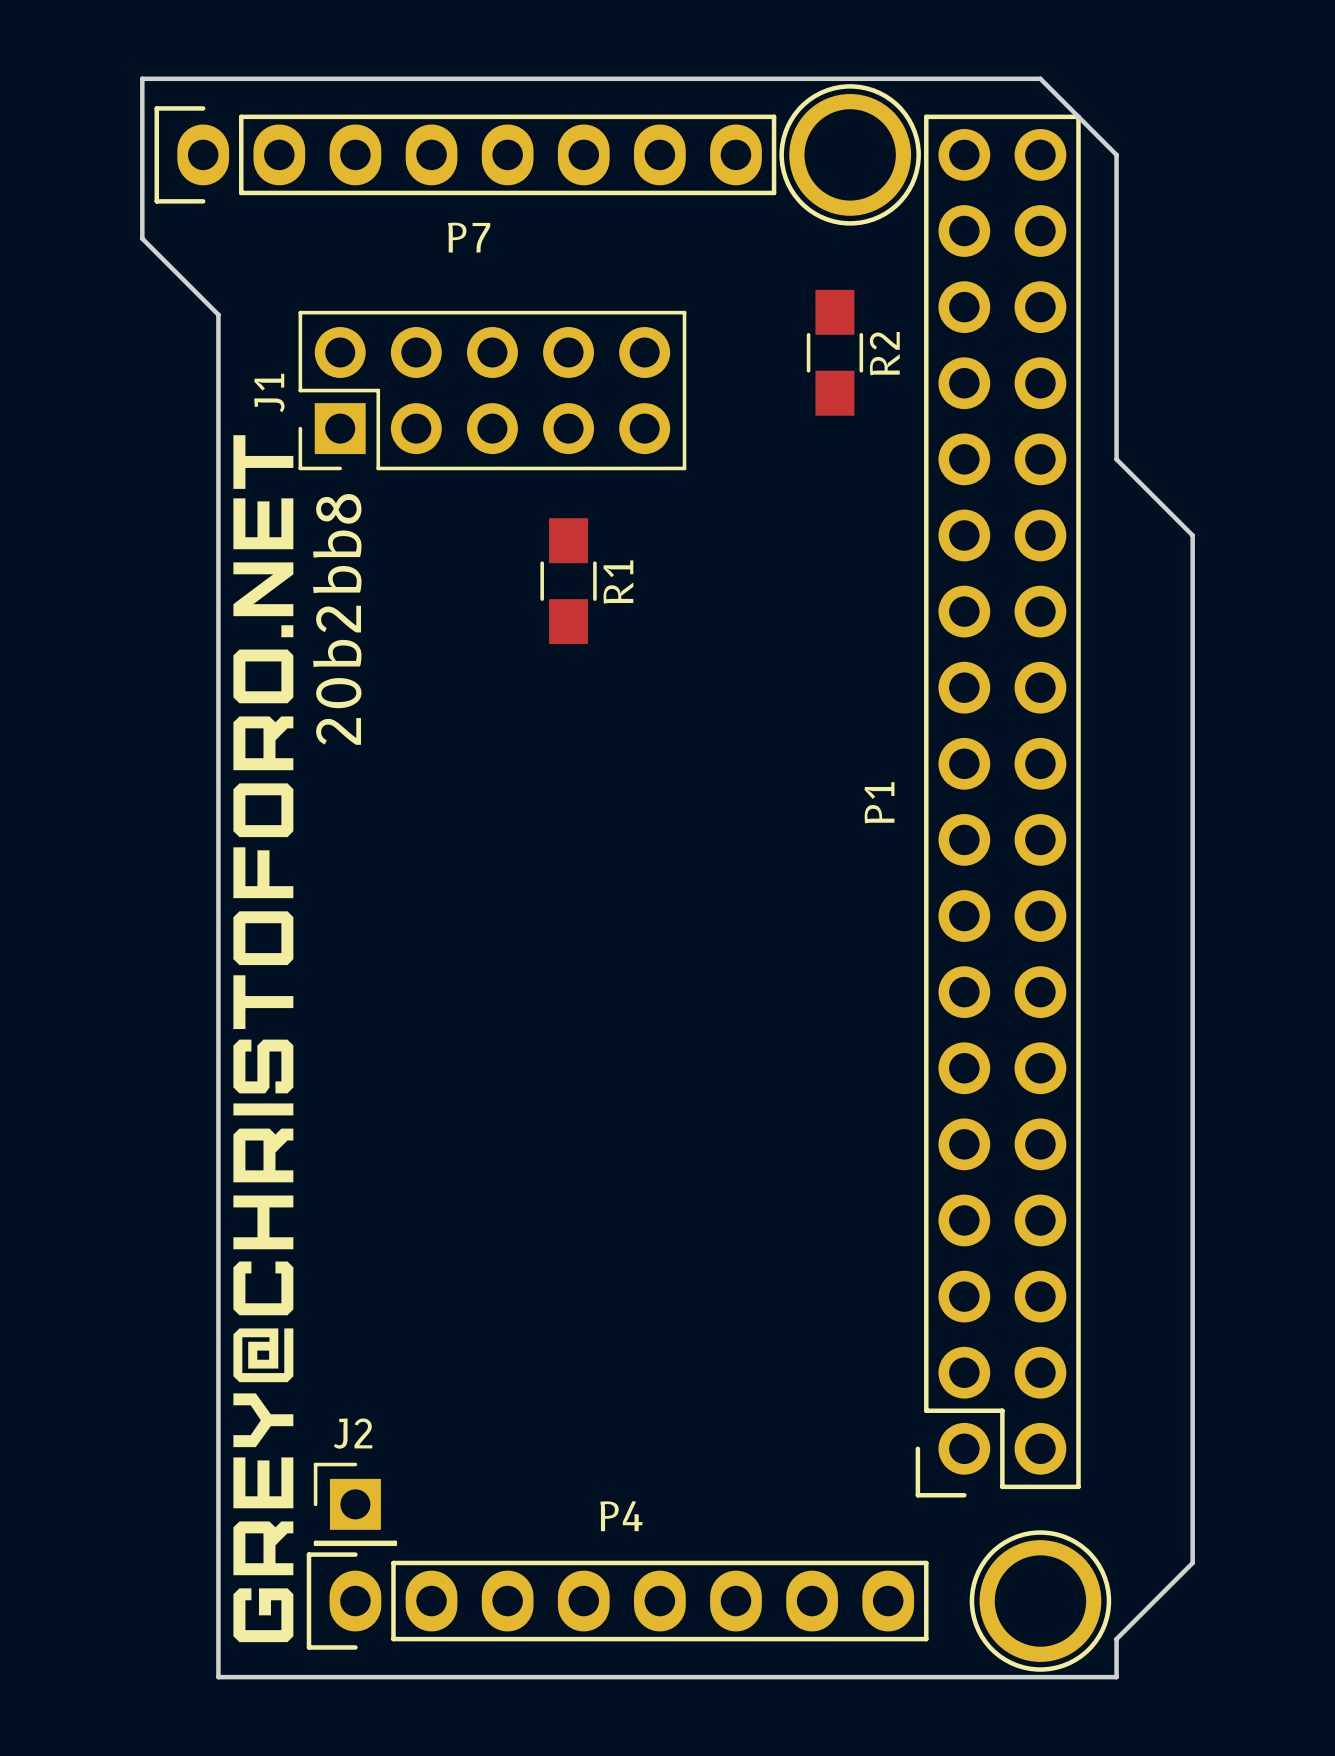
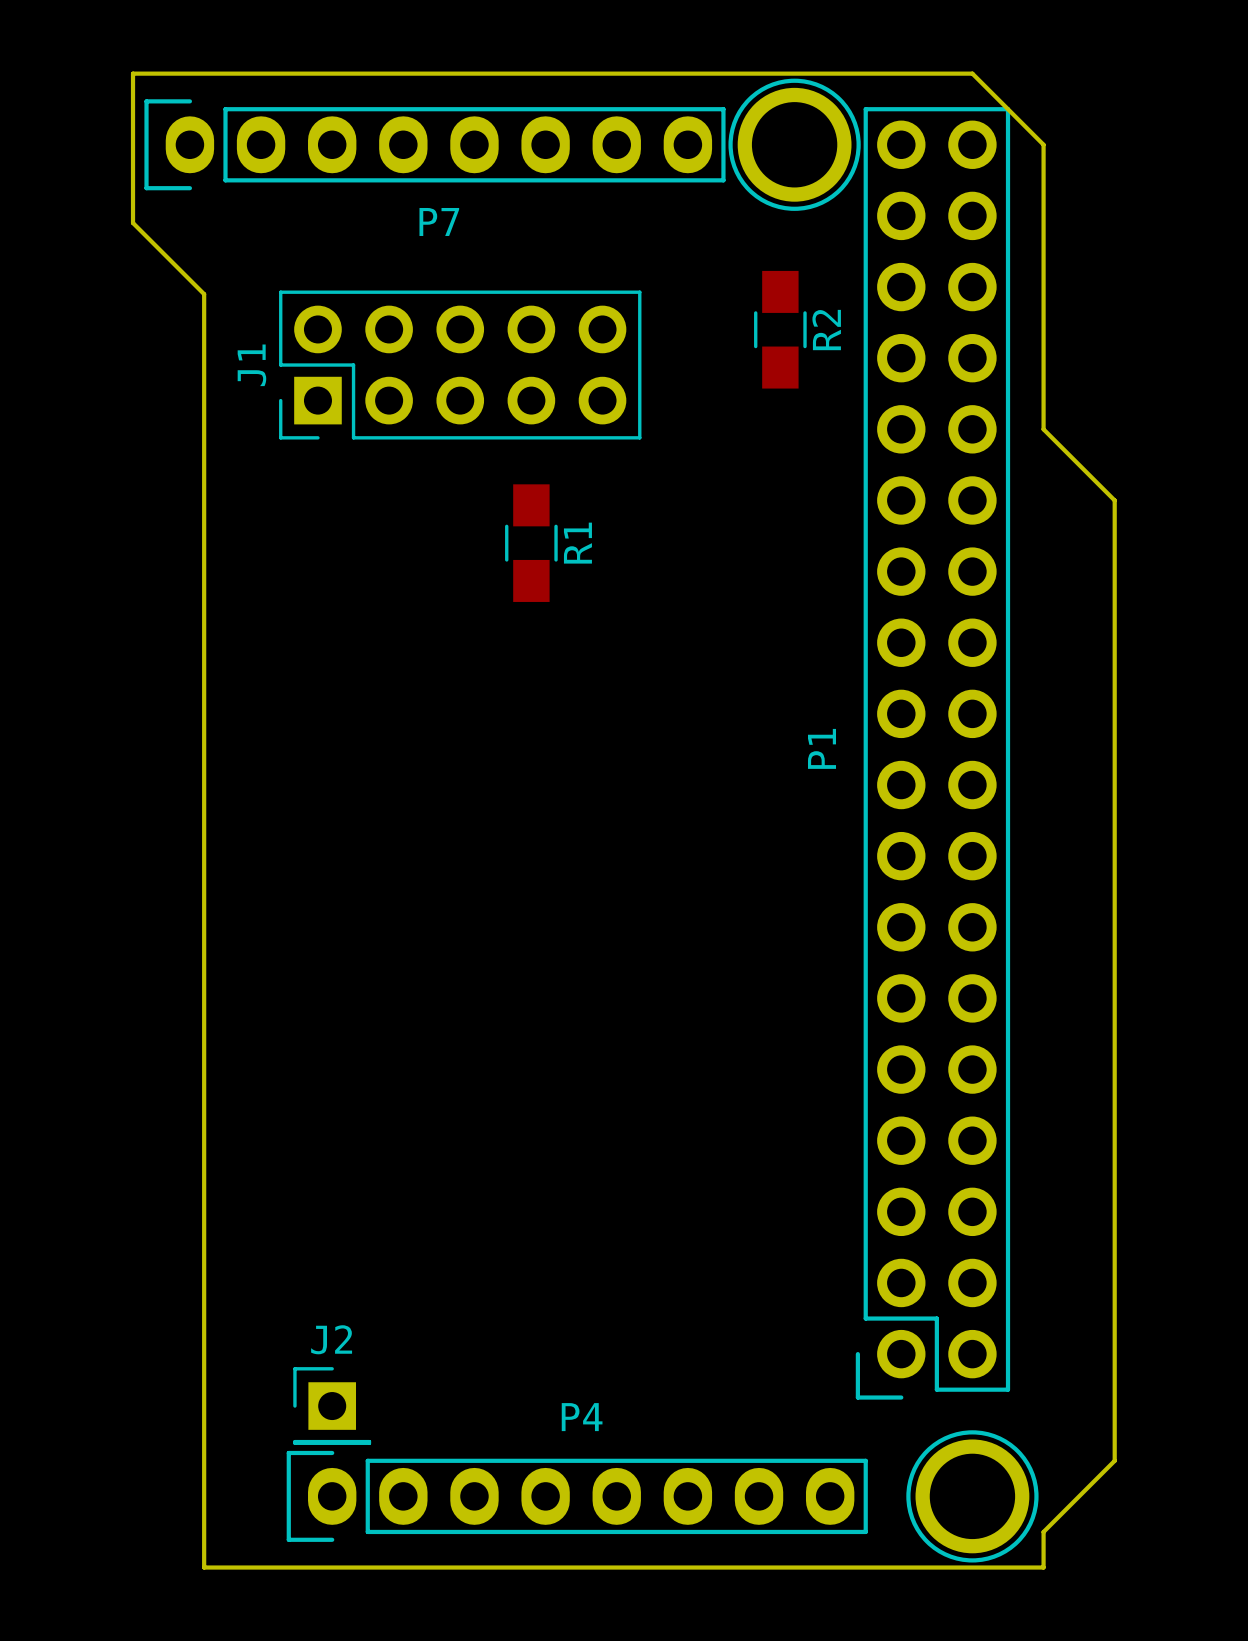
drawing: [233, 435, 294, 1643] -> none
text: 20b2bb8 (337, 619) -> none

